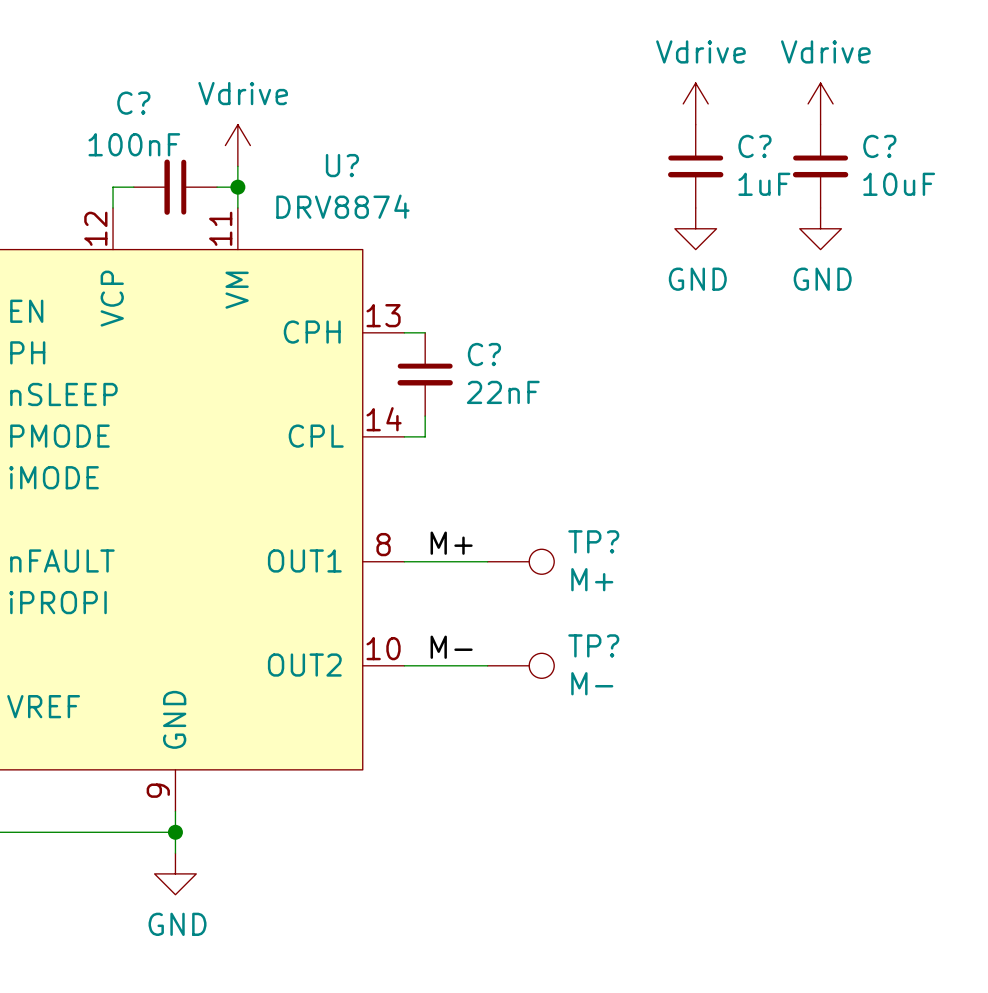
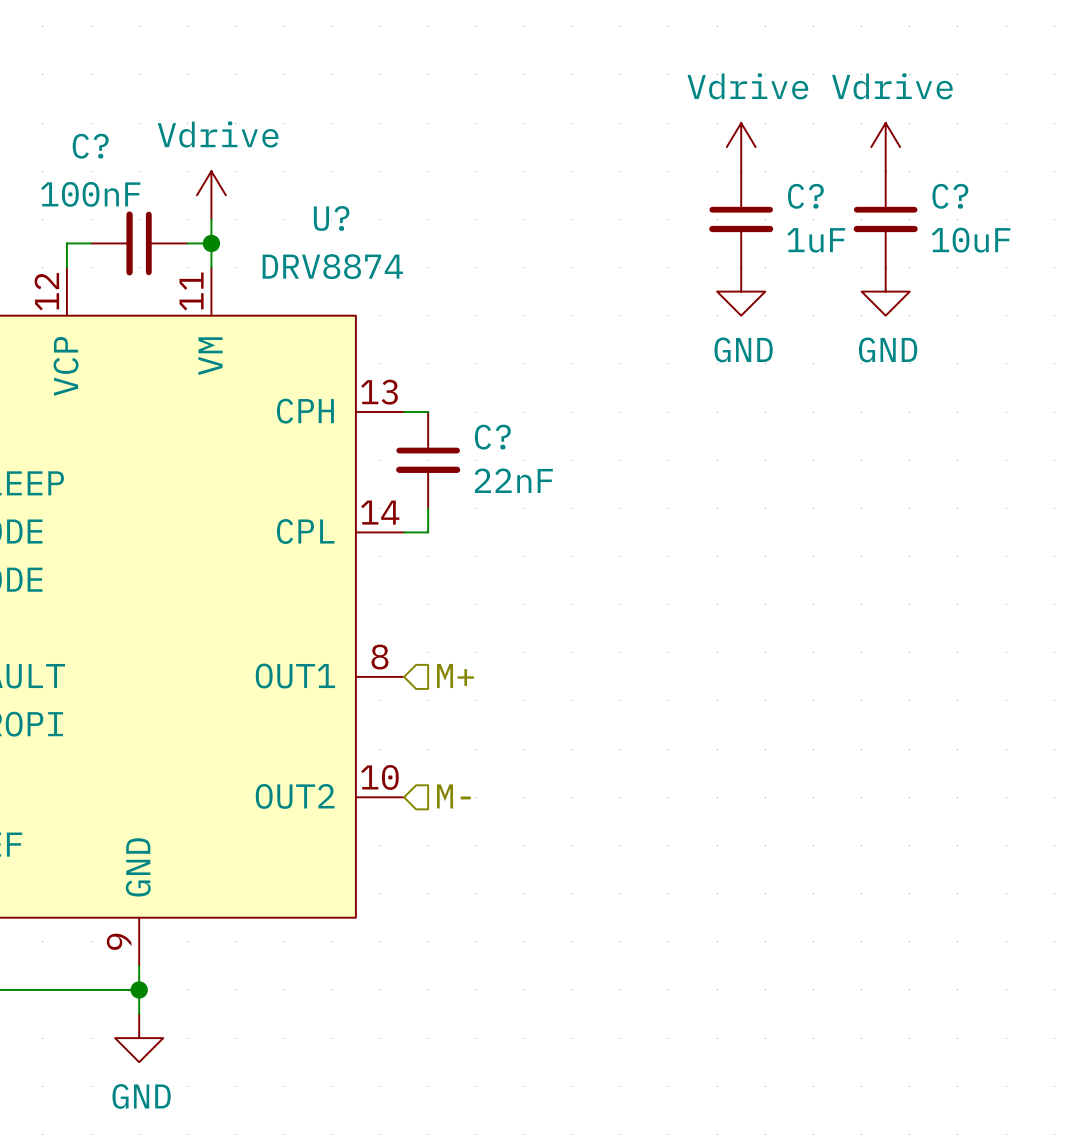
label: M+ (451, 543) -> none
hierarchical label: none -> M+ (455, 676)
wire: (404, 561) (487, 561) -> none
TP?: M+ (520, 561) -> none
label: M- (451, 647) -> none
wire: (404, 665) (487, 665) -> none
hierarchical label: none -> M- (453, 796)
TP?: M- (520, 665) -> none

